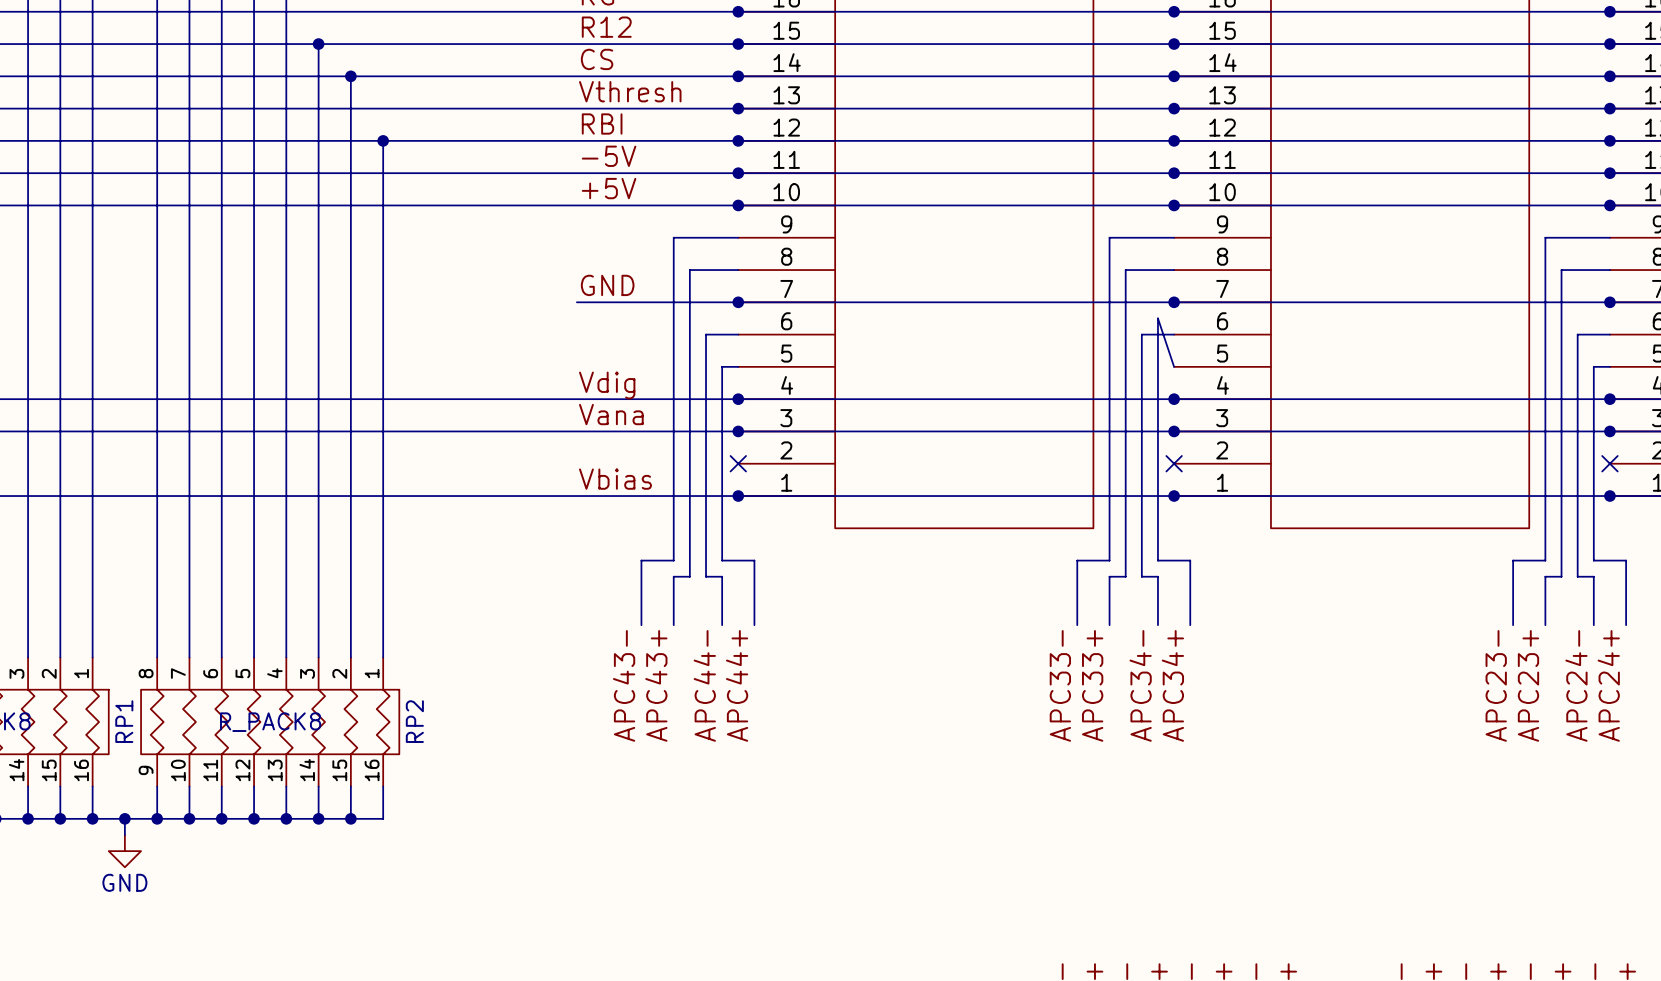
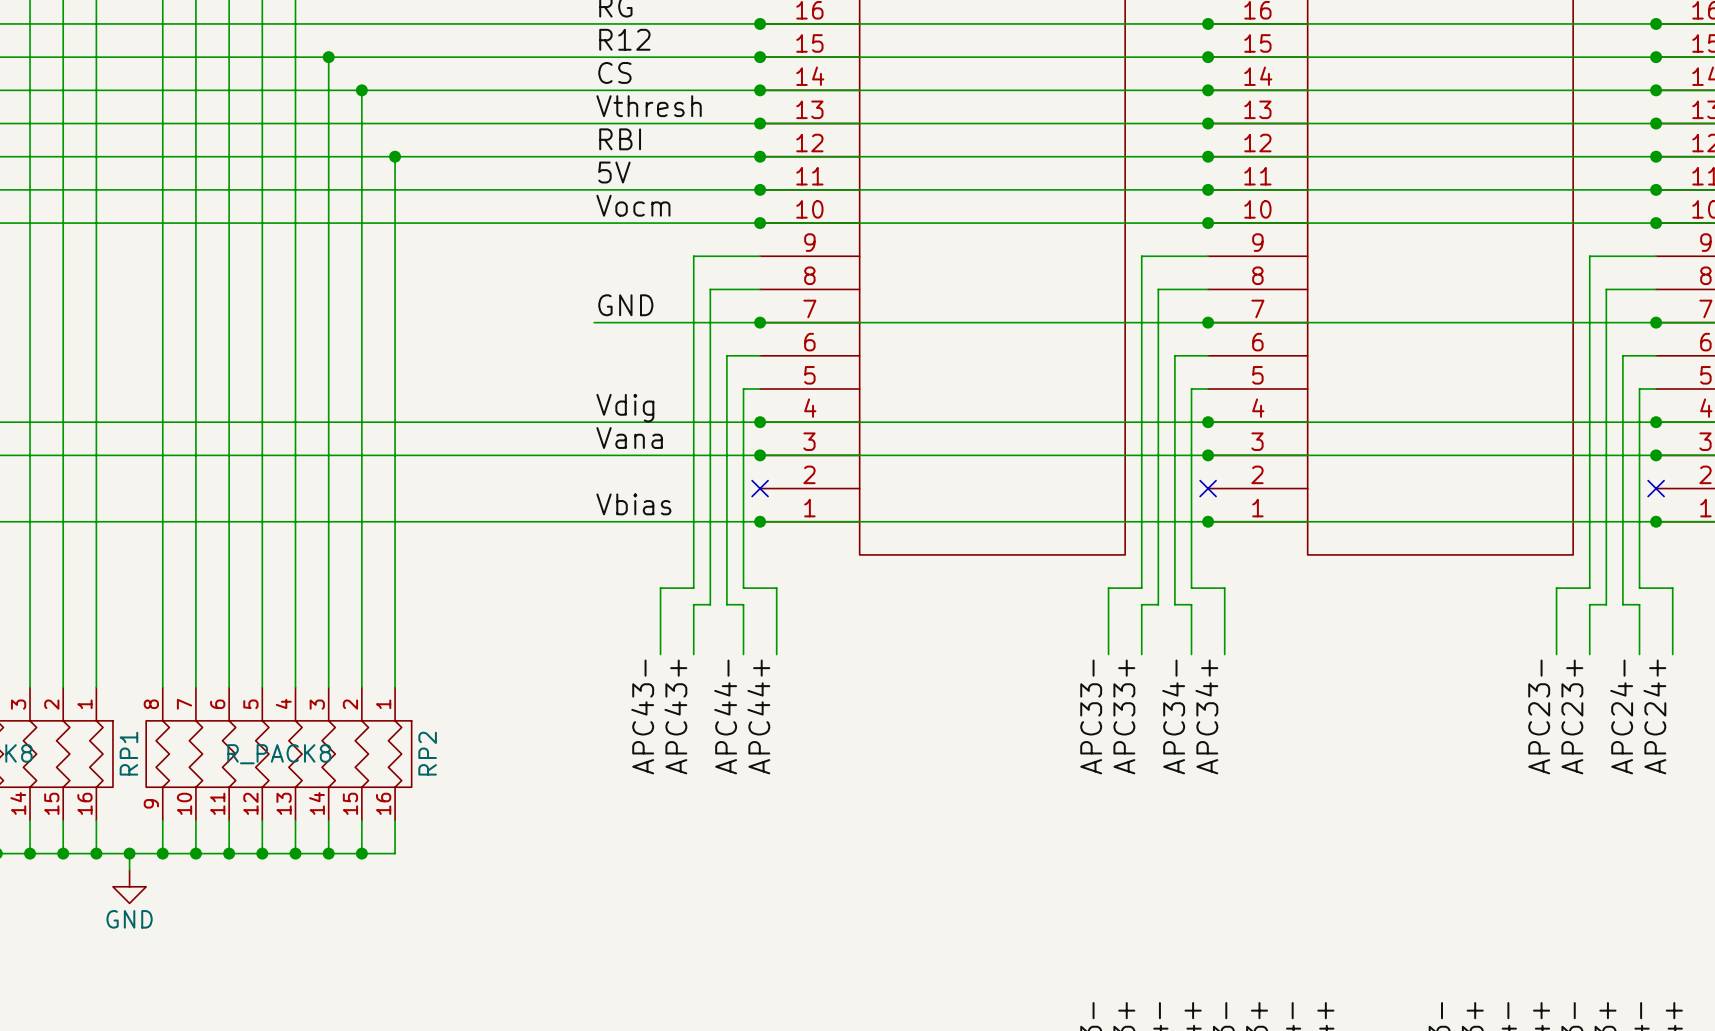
label: -5V (609, 156) -> 5V (614, 172)
label: +5V (609, 188) -> Vocm (633, 205)
wire: (1157, 366) (1157, 318) (1174, 366) -> (1191, 389) (1208, 389)

